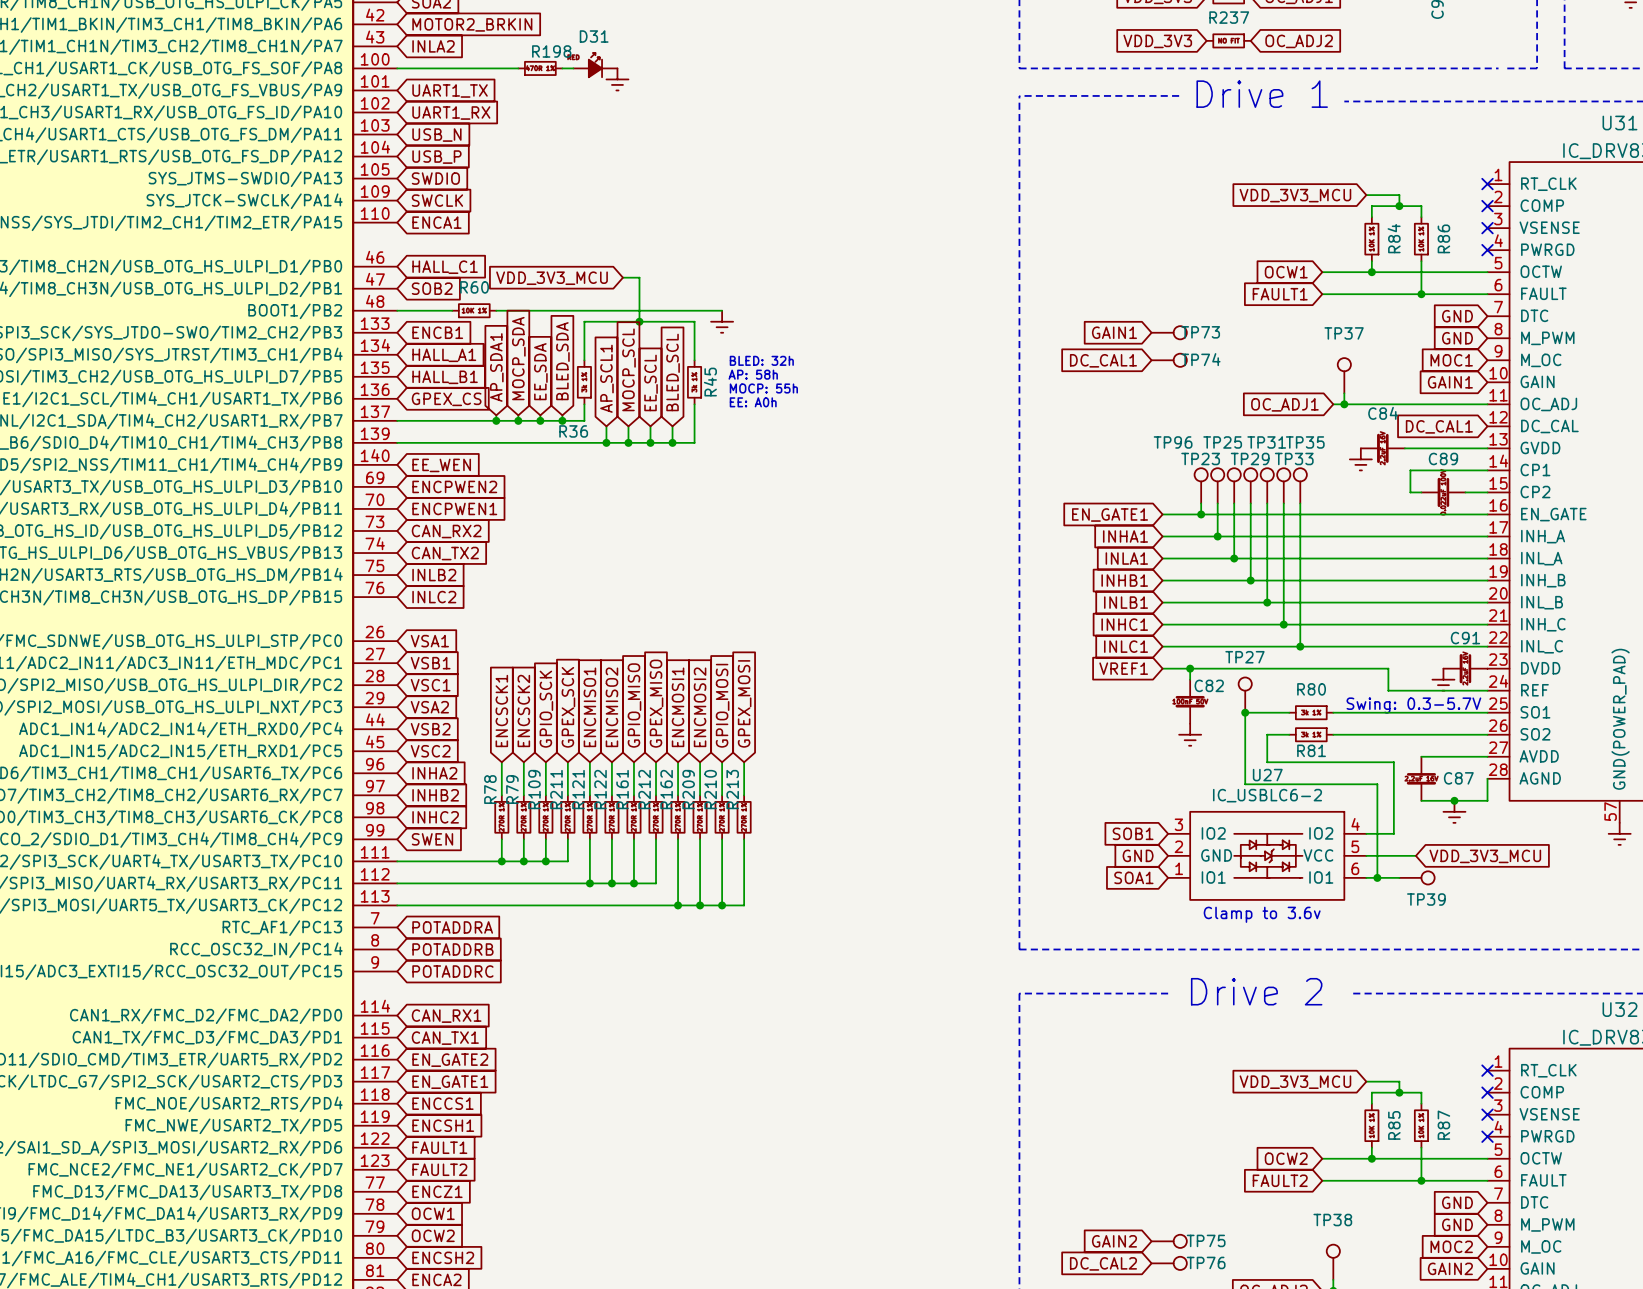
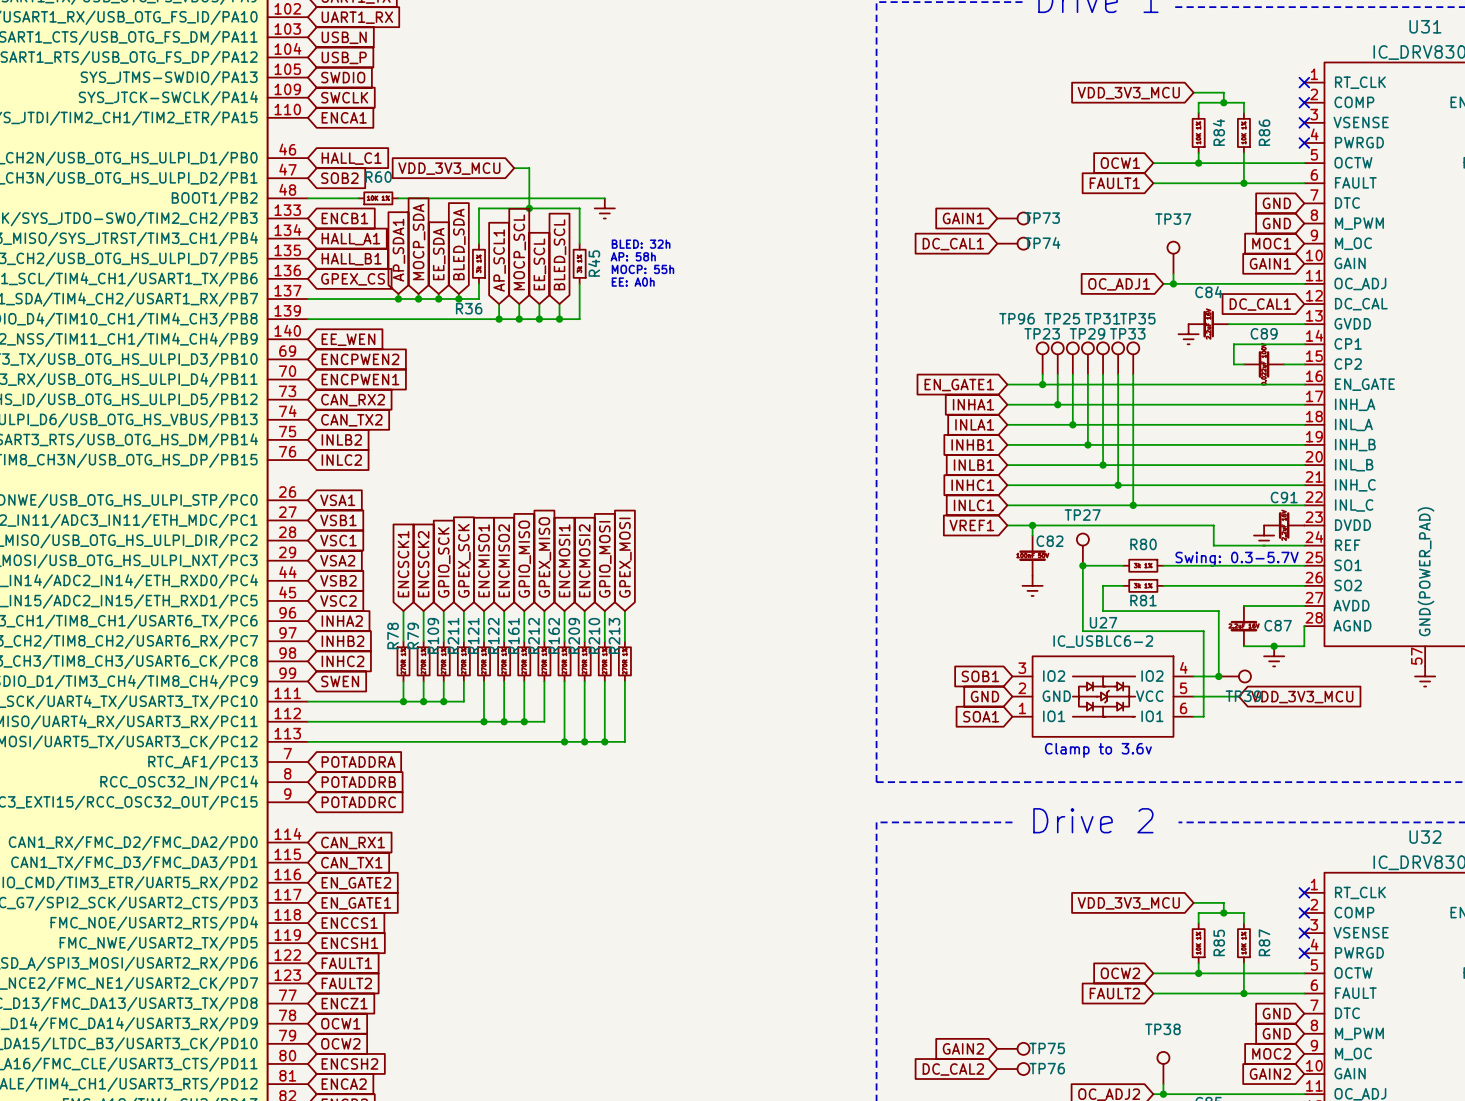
wire: (1377, 877) (1399, 877) -> none
junction position: (1377, 877) -> (1218, 676)
TP39 position: (1417, 877) -> (1234, 676)

